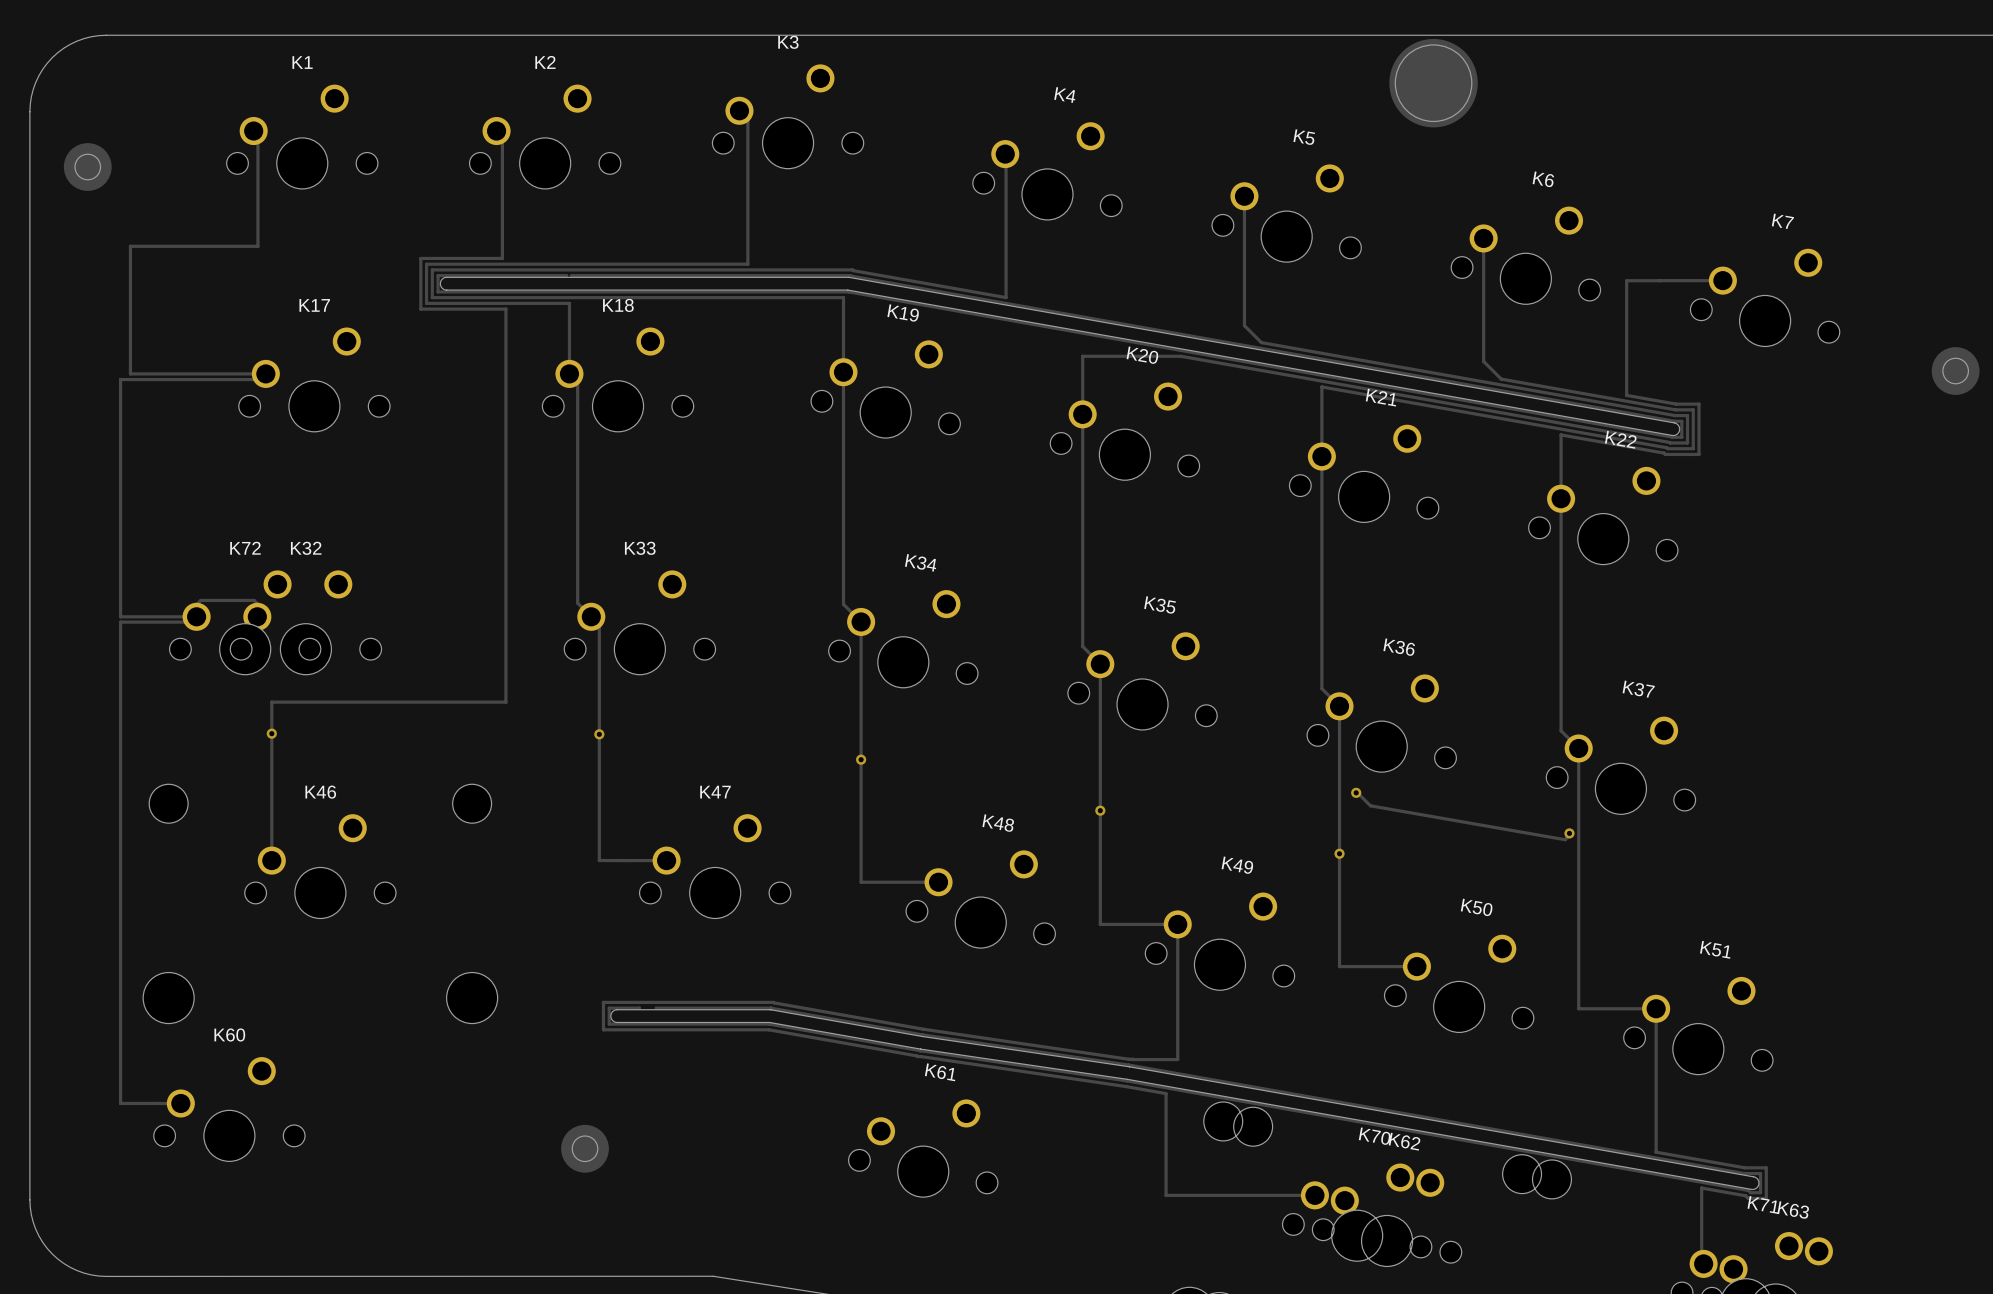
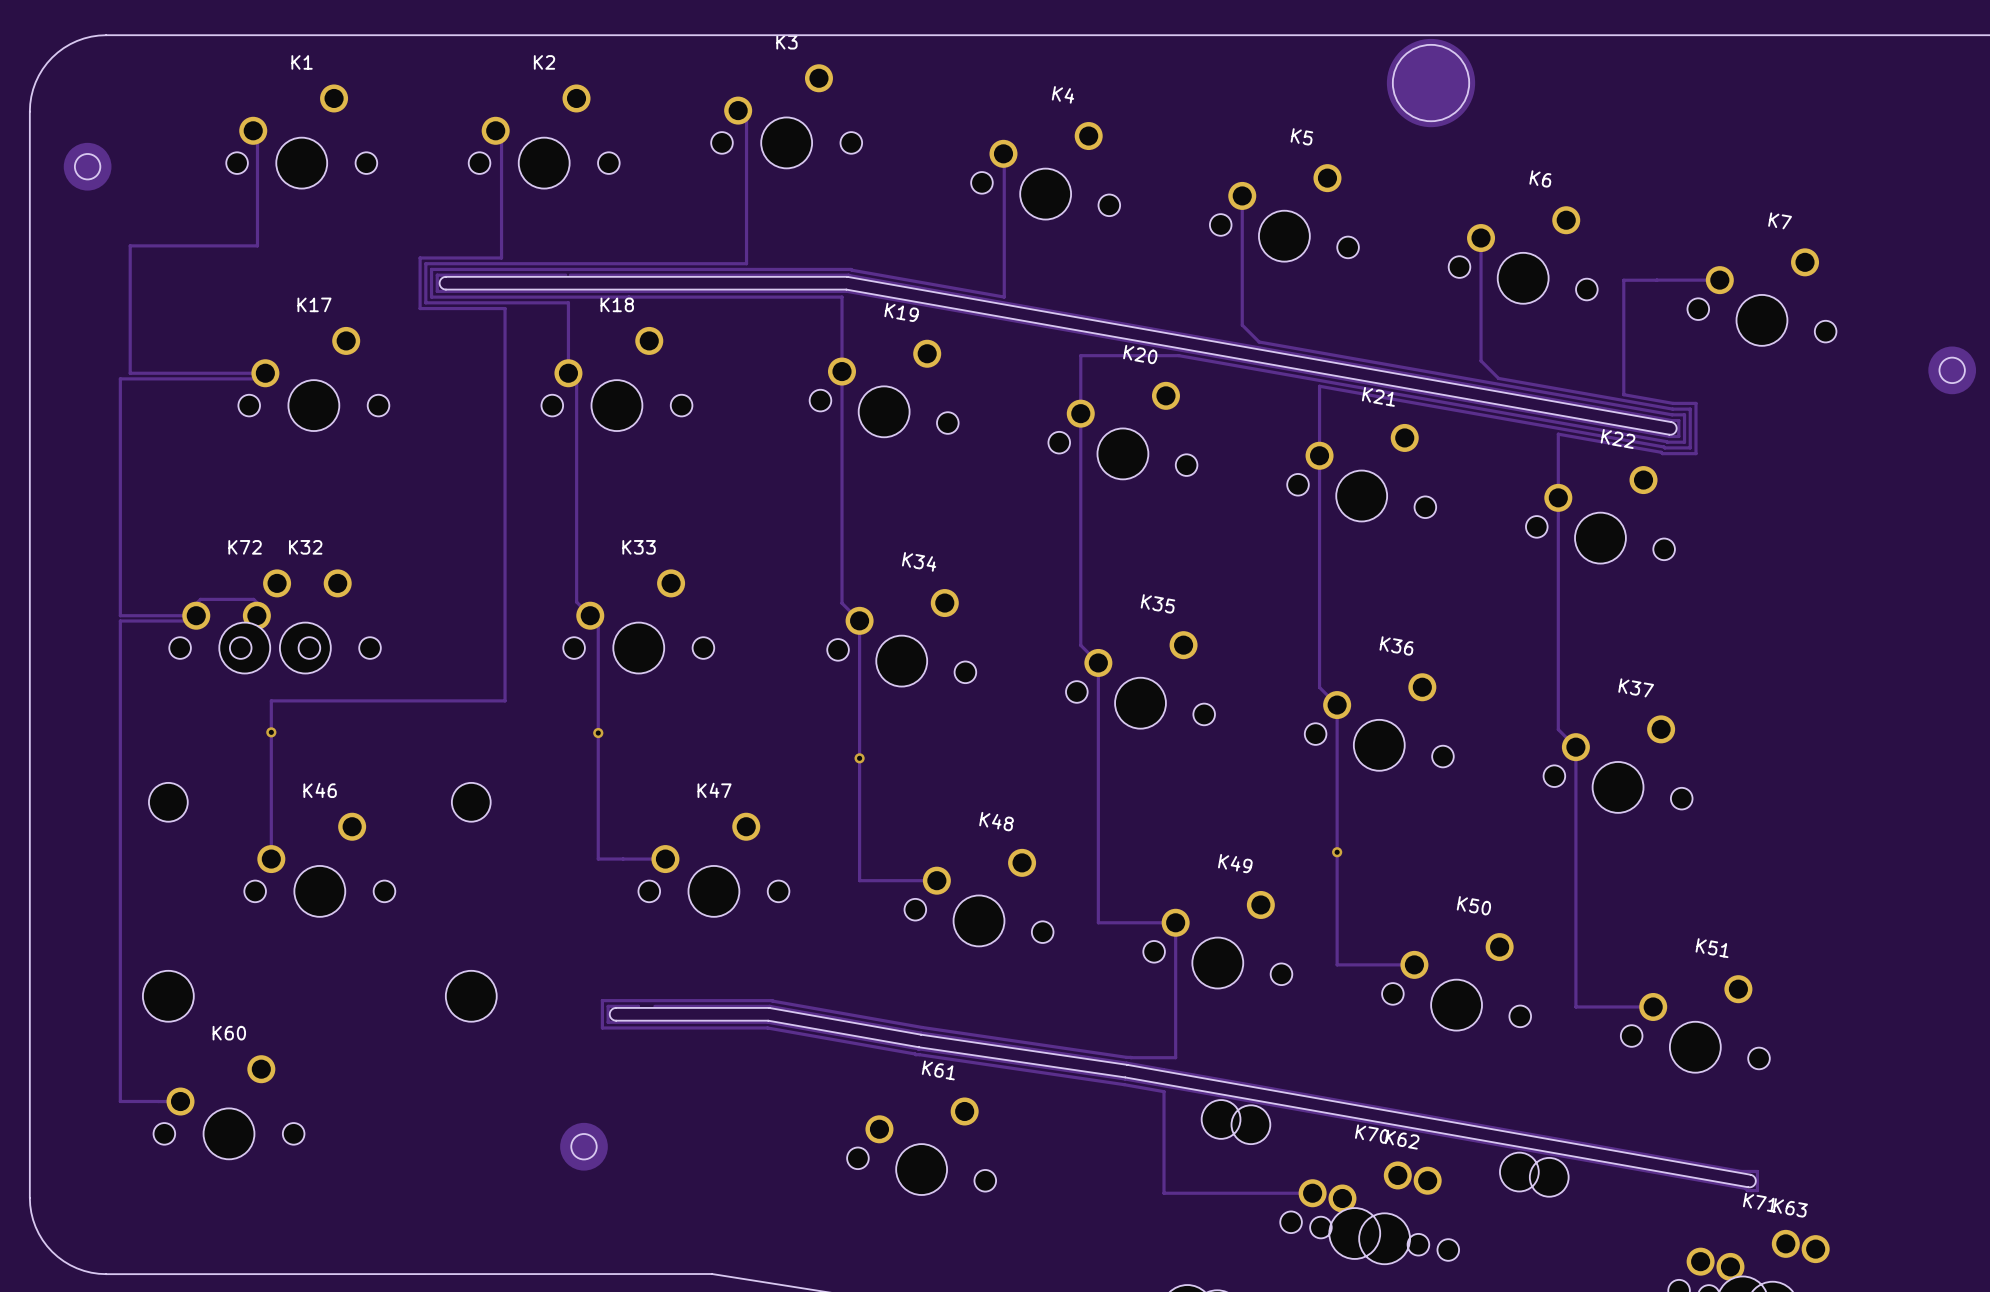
via: (1356, 792) -> none
track: (1358, 795) (1356, 792) (1370, 805) (1565, 839) (1569, 833) -> none
via: (1100, 810) -> none
via: (1569, 833) -> none
track: (1656, 1008) (1656, 1152) -> none
track: (1656, 1152) (1744, 1167) (1766, 1167) (1766, 1198) -> none
track: (1766, 1198) (1748, 1198) (1745, 1195) (1701, 1188) (1701, 1261) (1703, 1263) -> none

